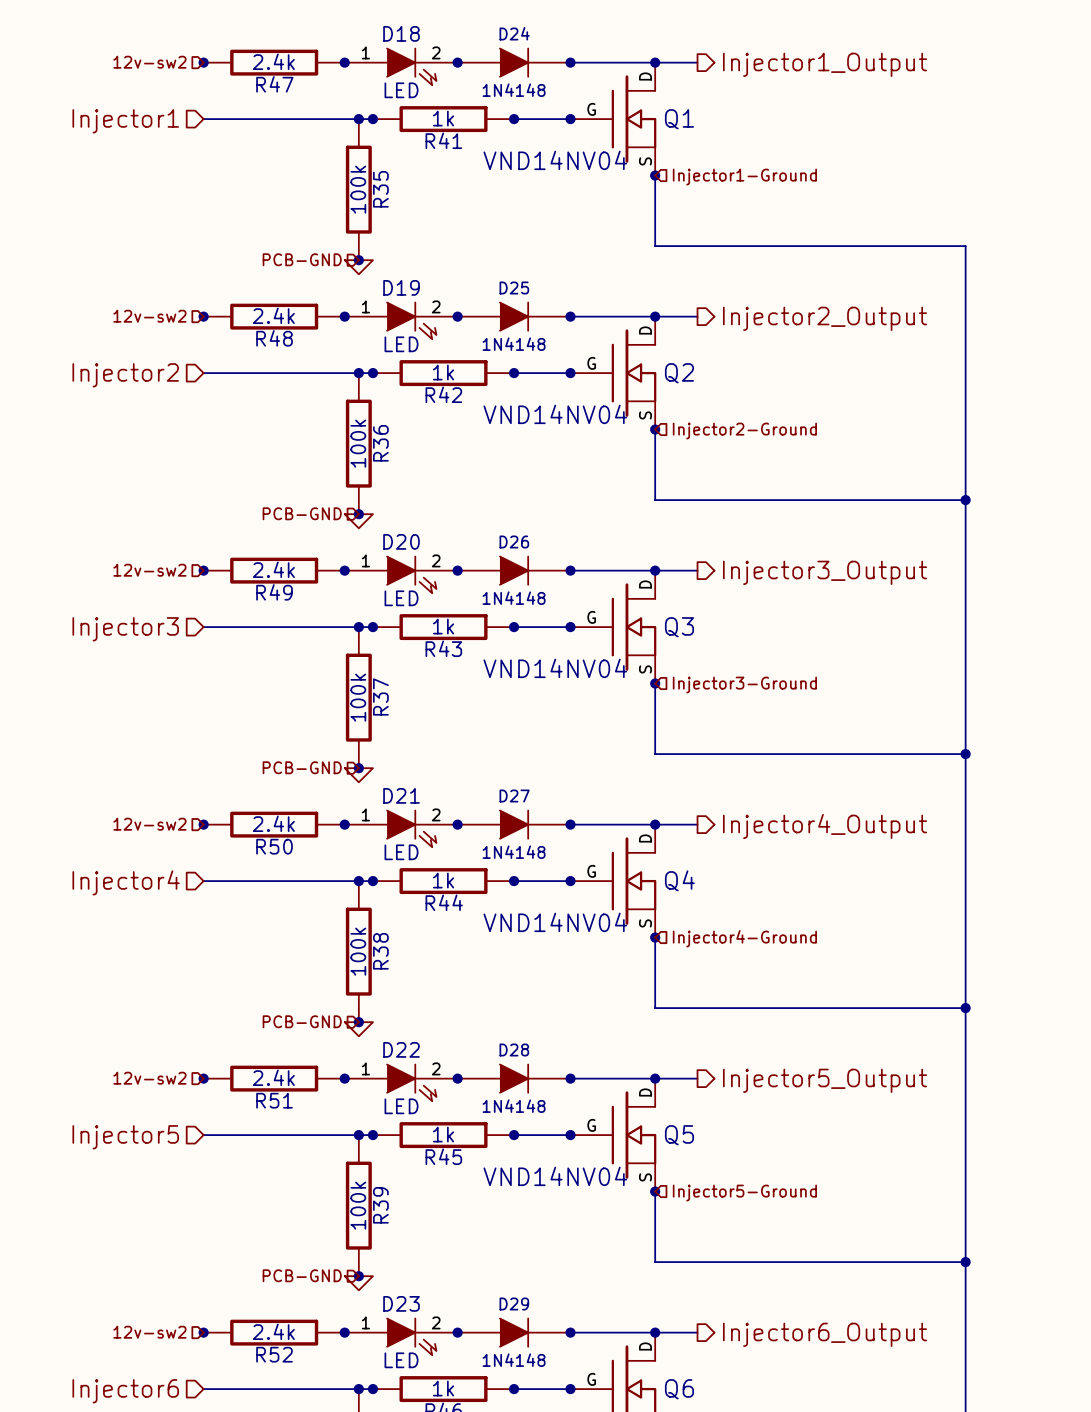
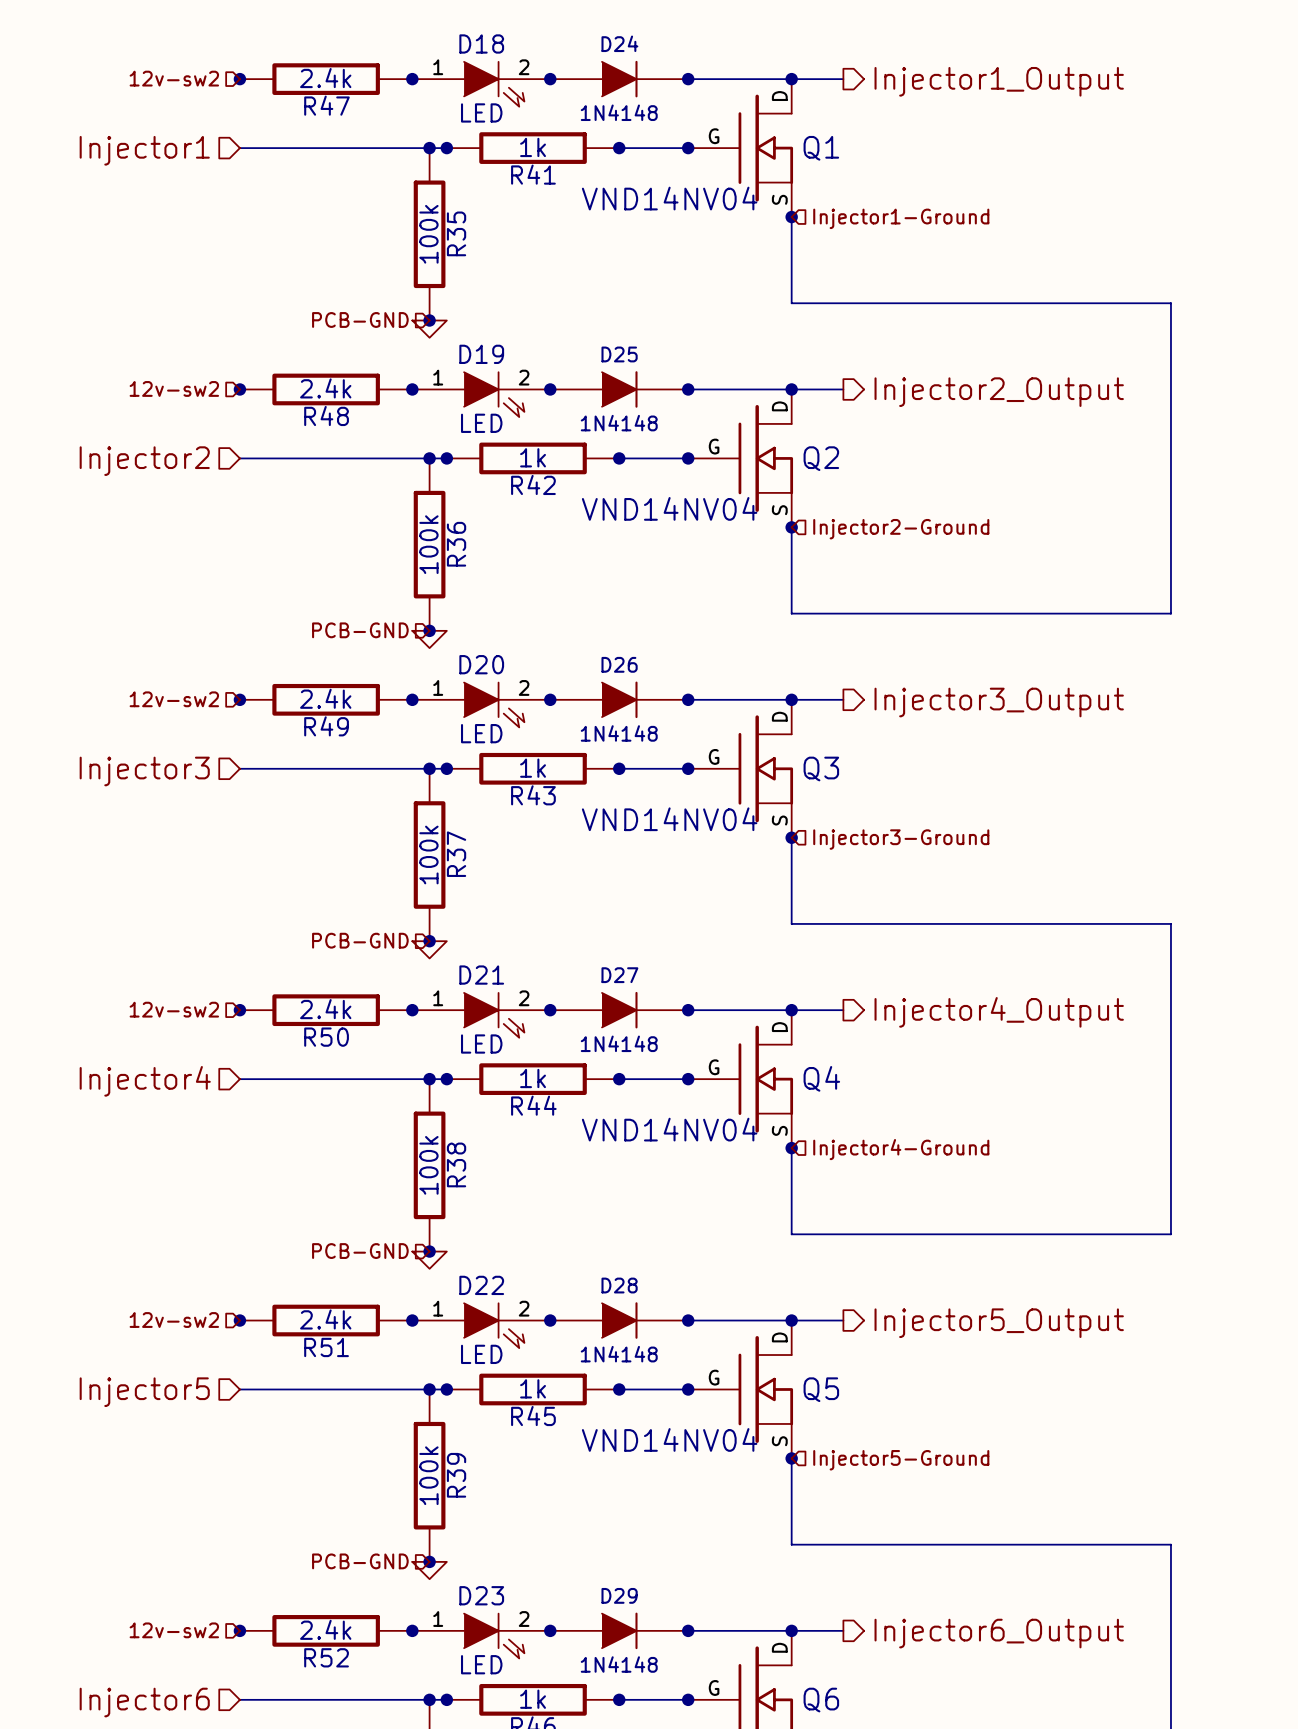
wire: (965, 500) (965, 754) -> none
junction: (965, 500) -> none
junction: (965, 754) -> none
wire: (965, 1008) (965, 1262) -> none
junction: (965, 1008) -> none
junction: (965, 1262) -> none

